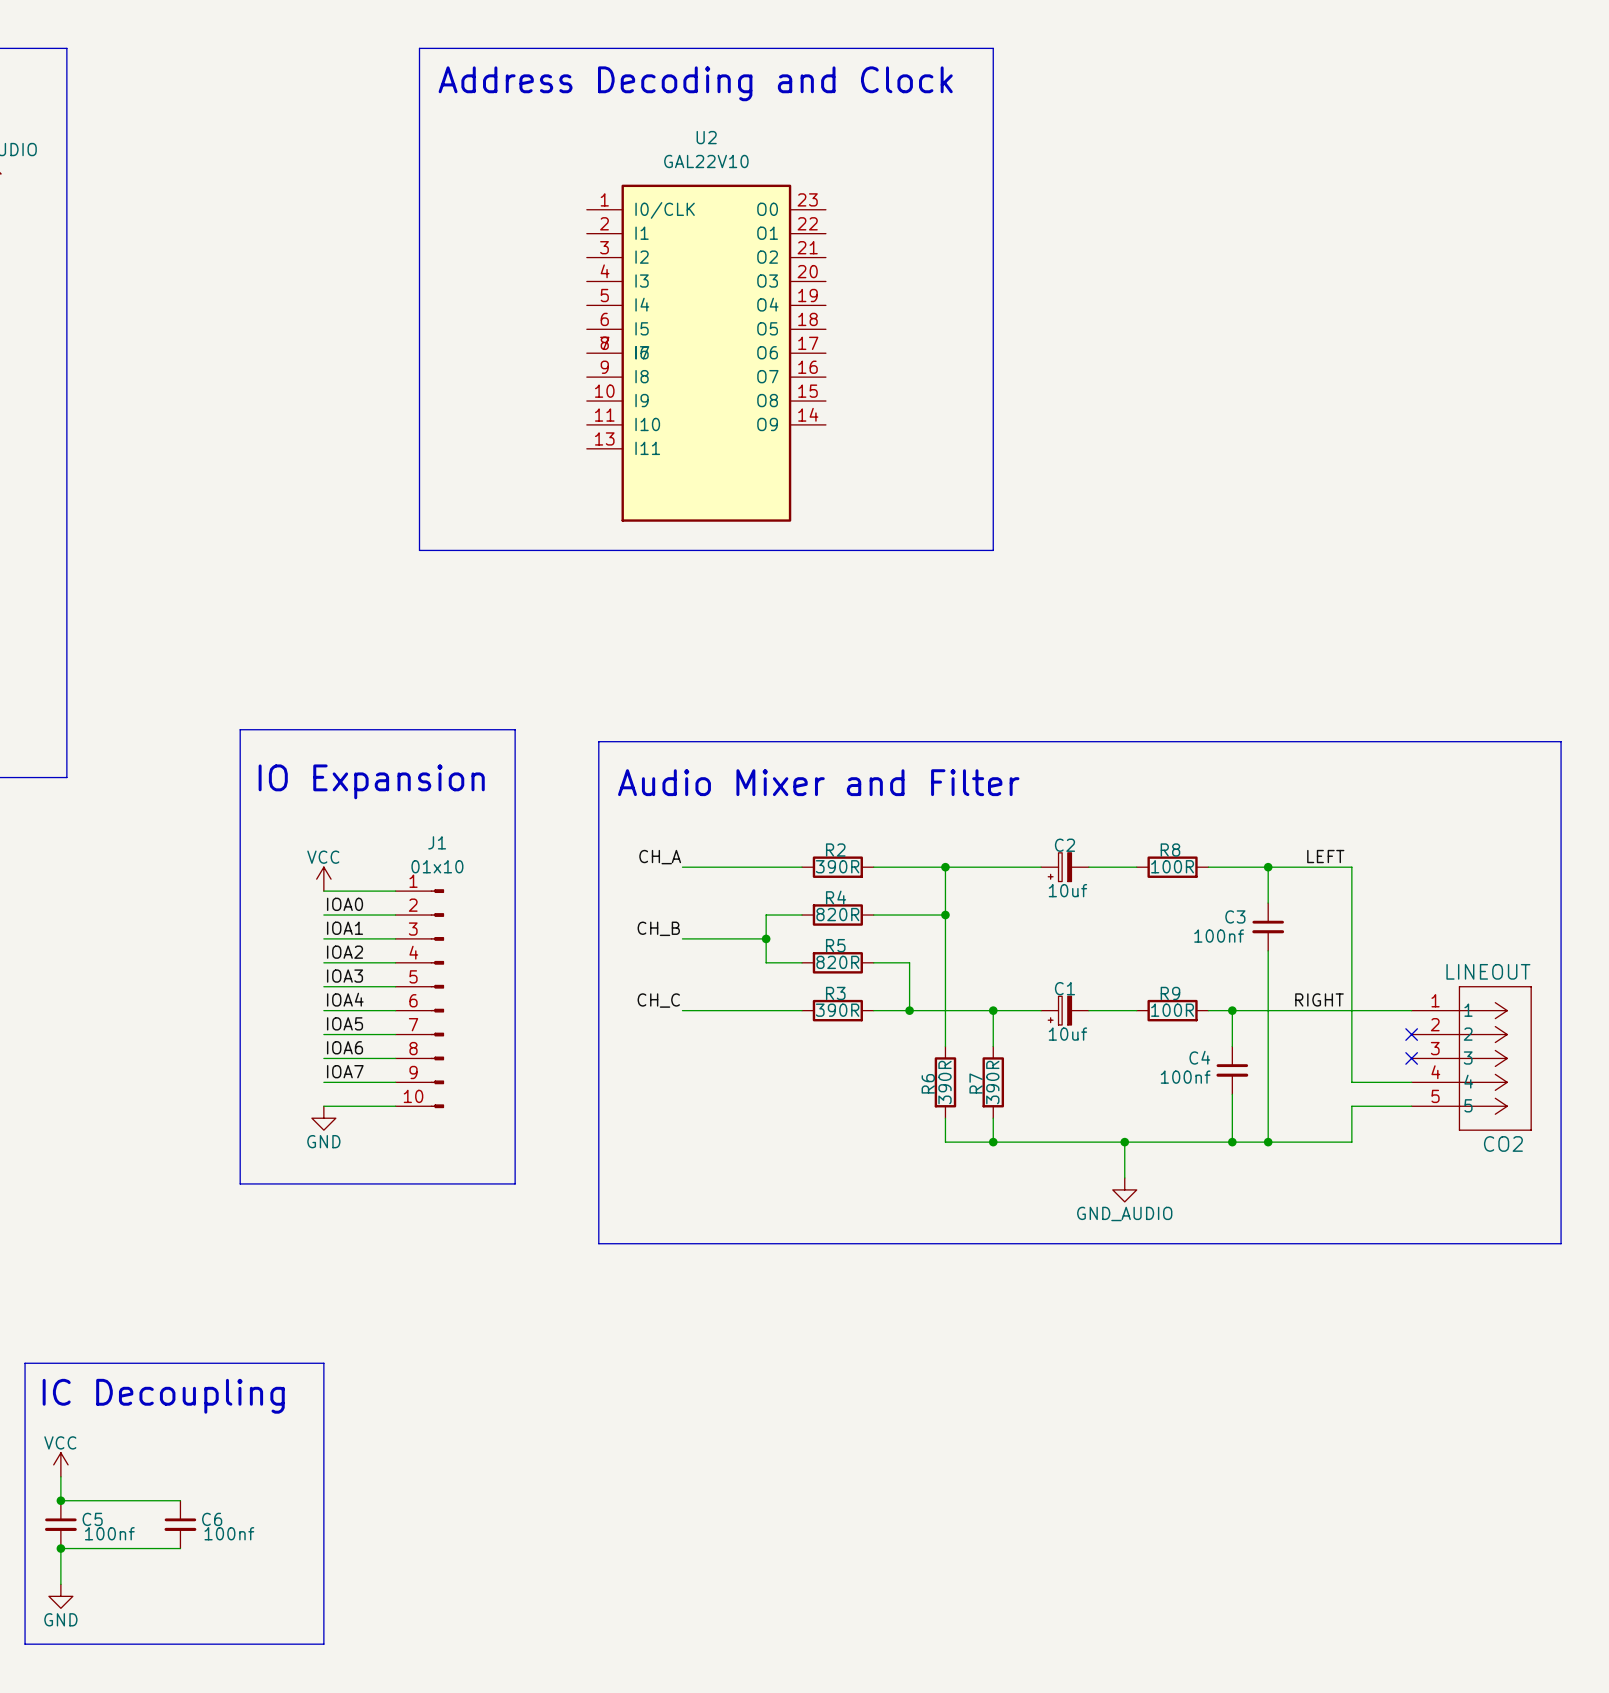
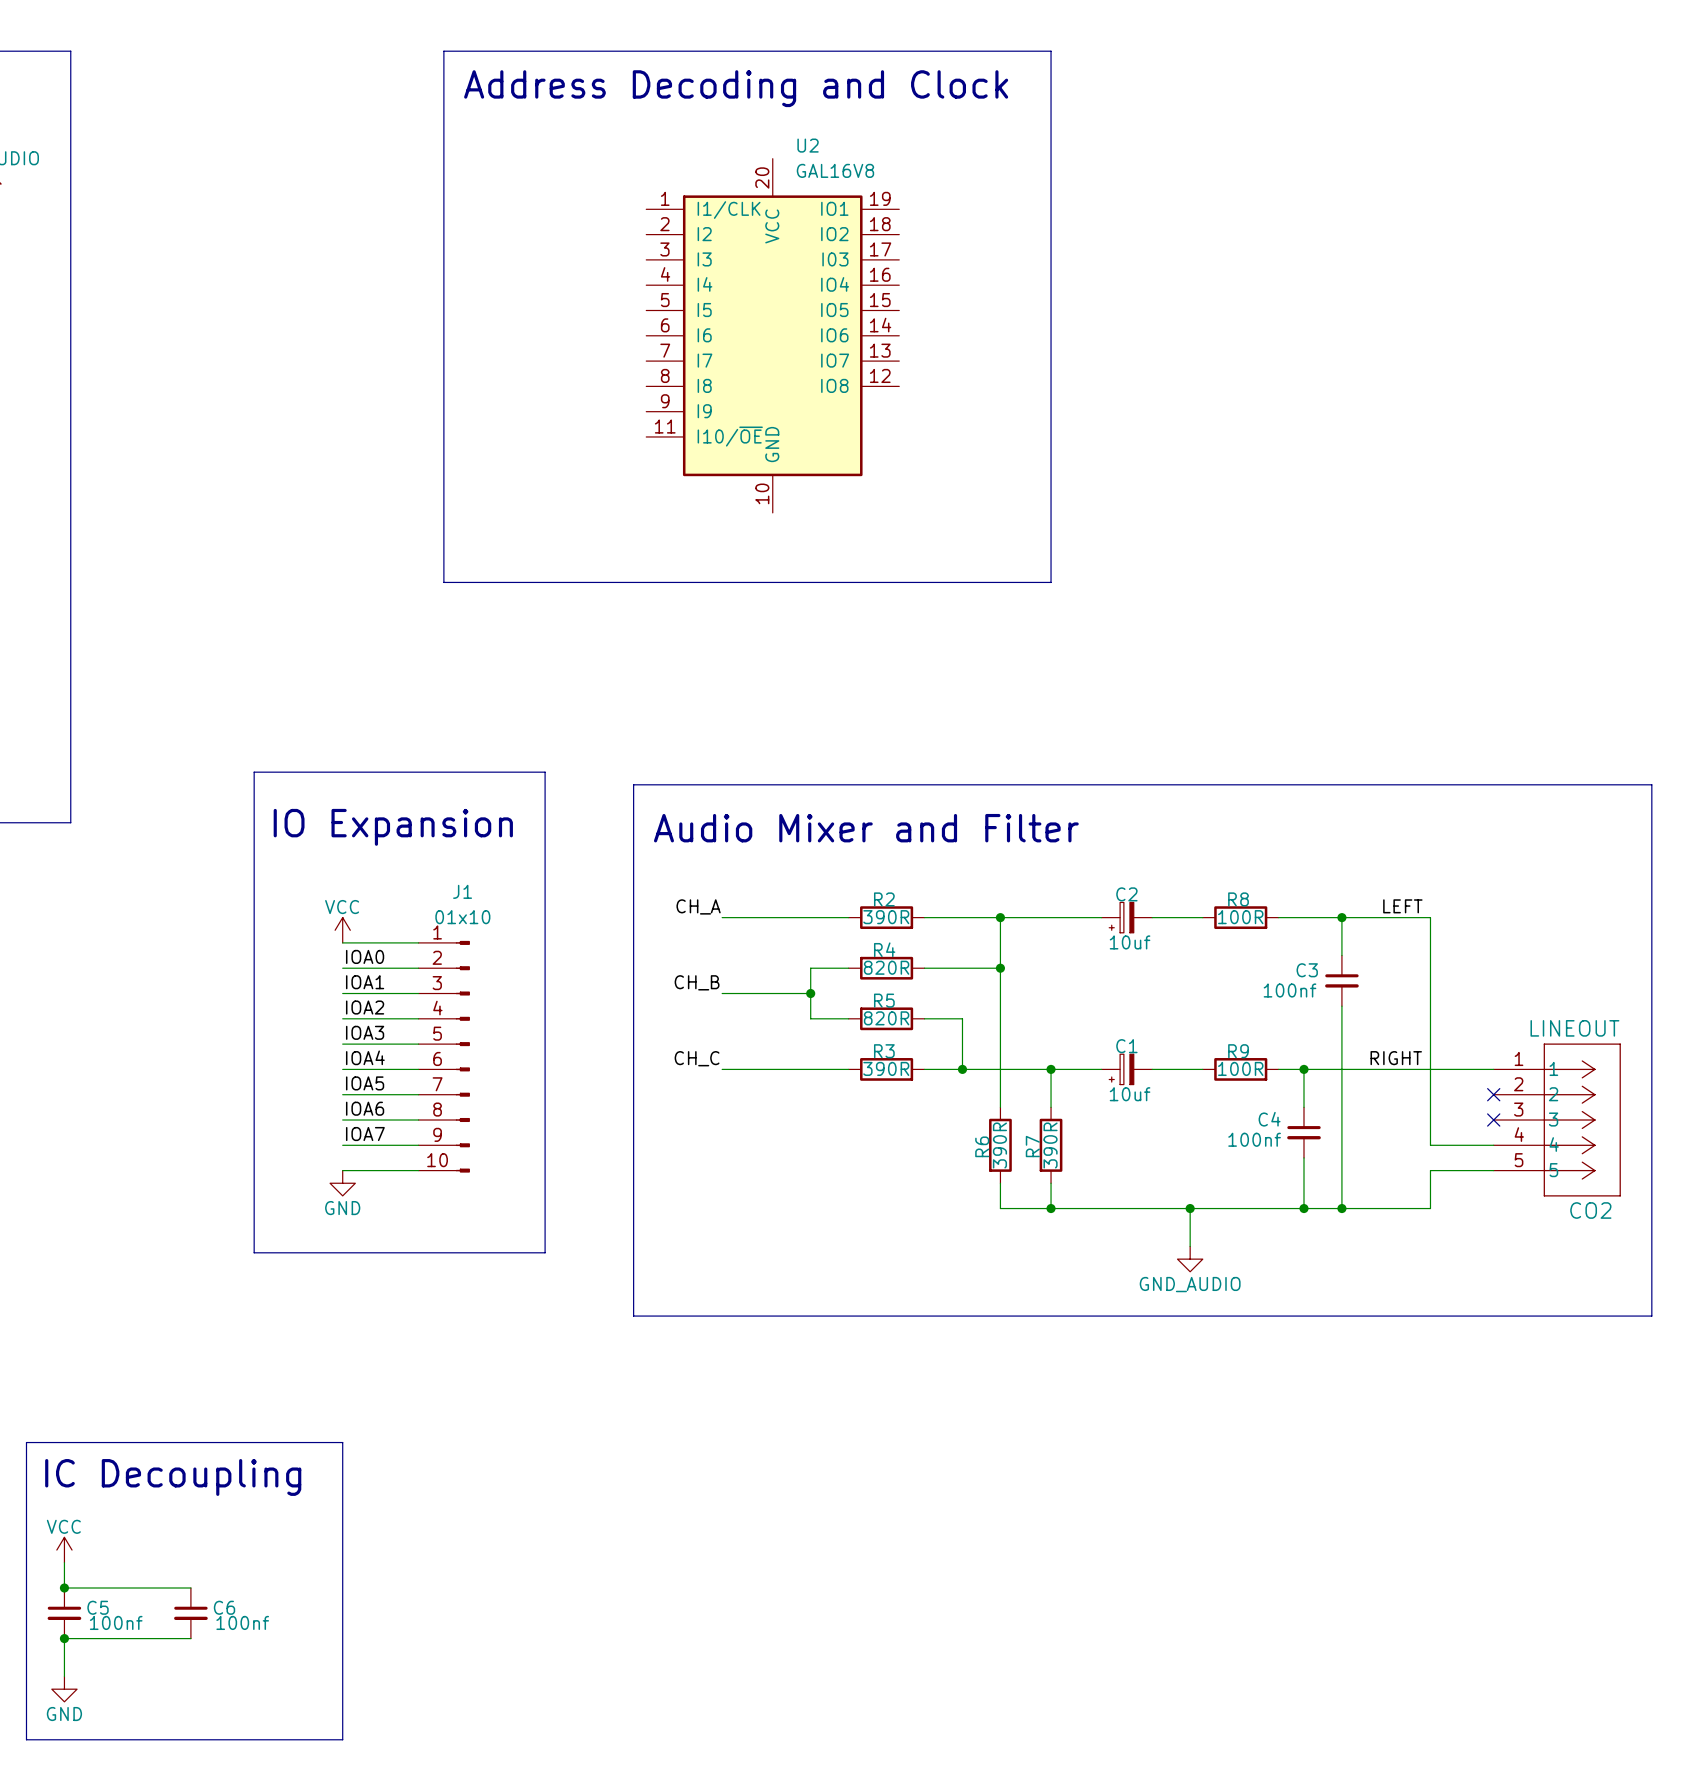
U2 name position: U2 (706, 137) -> U2 (808, 145)
U2 value: GAL22V10 (706, 161) -> GAL16V8 (835, 170)
U2 symbol: [586, 184, 826, 522] -> [646, 158, 900, 513]

